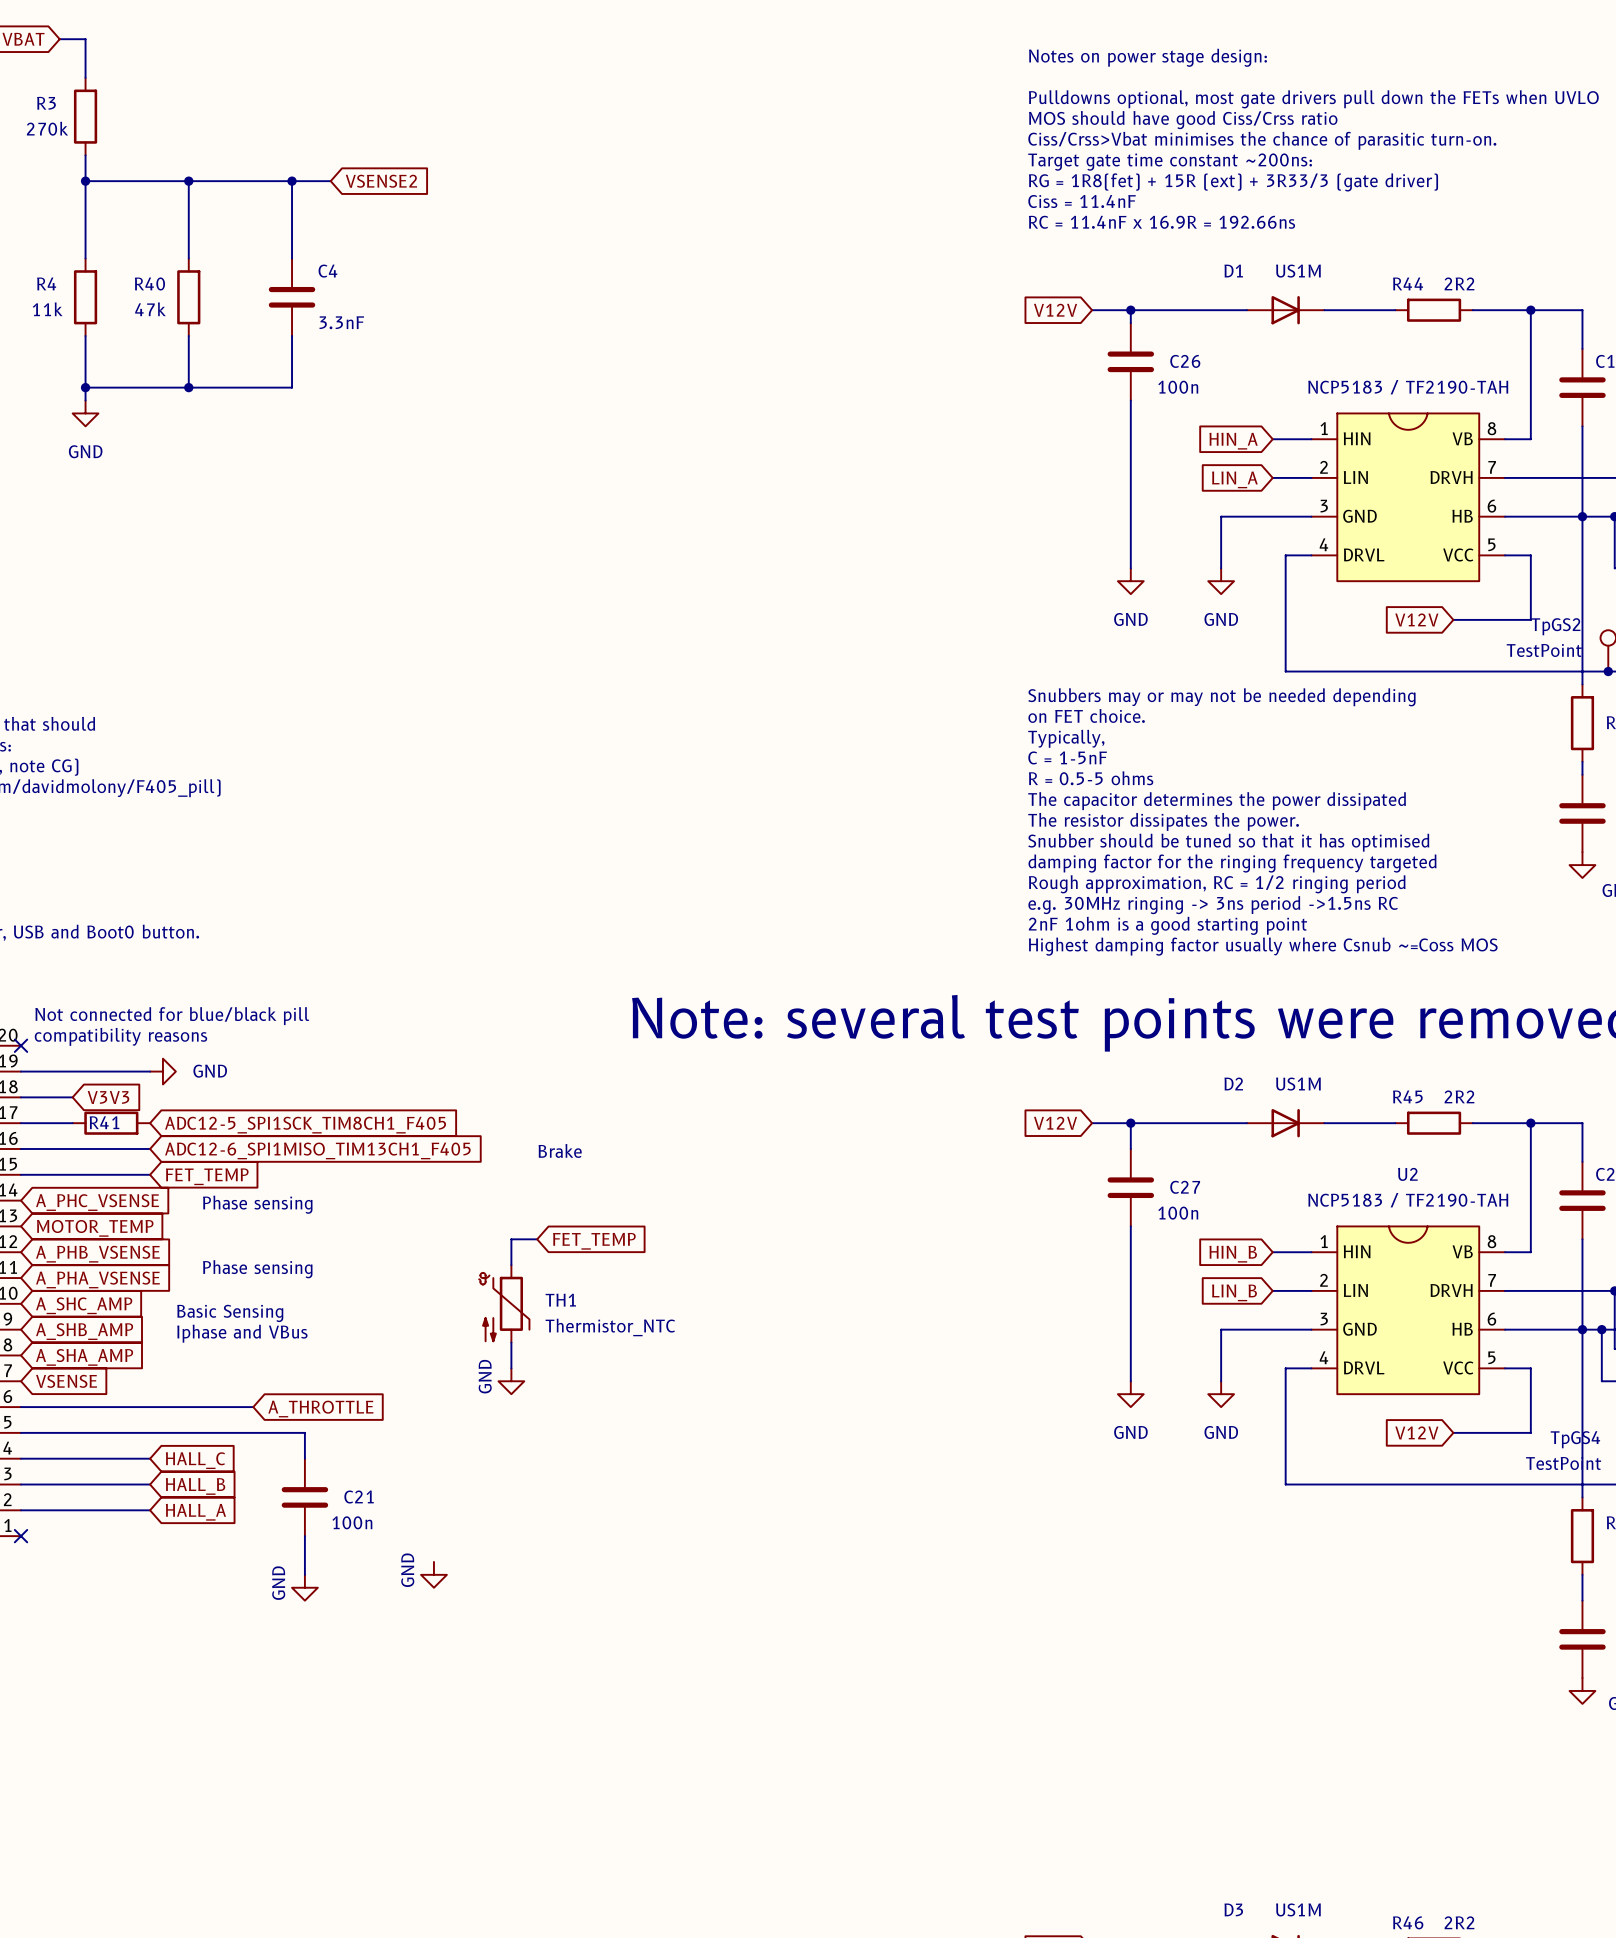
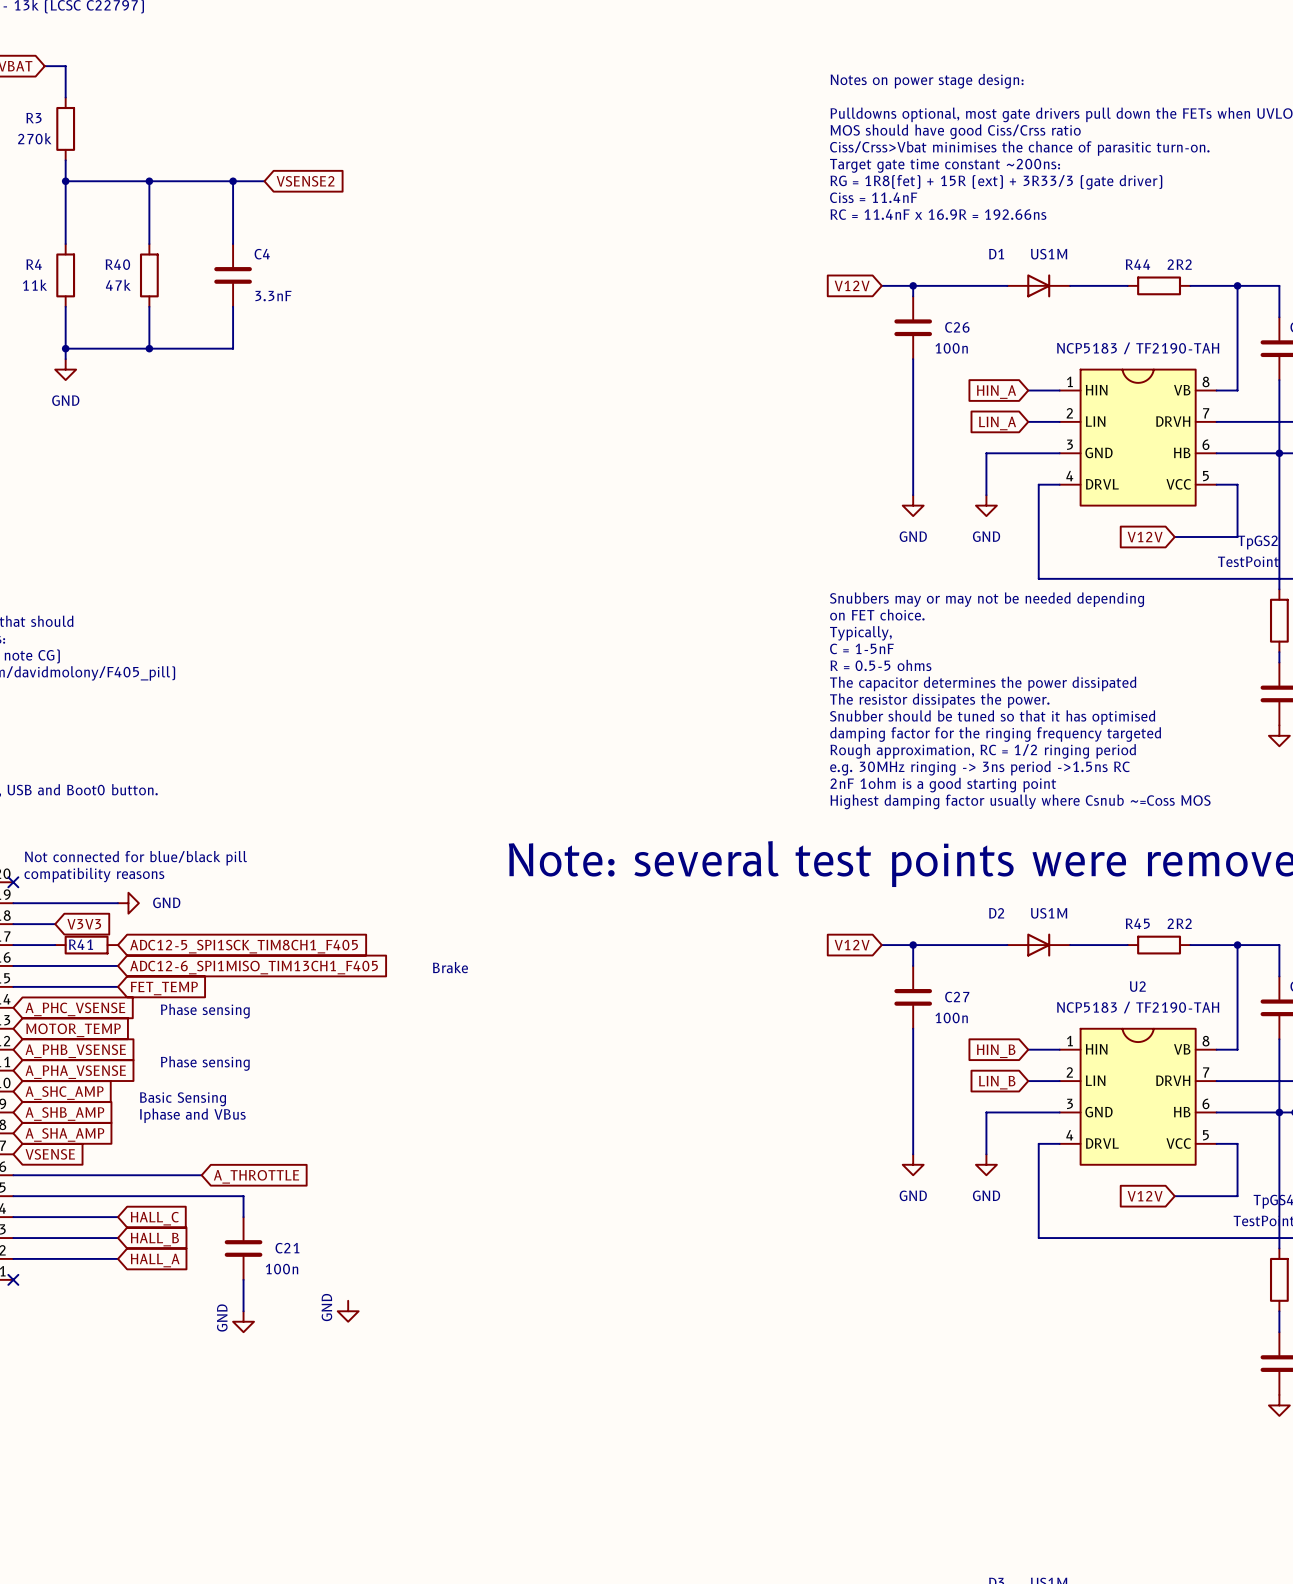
wire: (537, 1239) (511, 1239) (511, 1265) -> none
global label: FET_TEMP (594, 1241) -> none
TH1: Thermistor_NTC (504, 1303) -> none
wire: (511, 1342) (511, 1368) -> none
power symbol: GND (511, 1381) -> none

